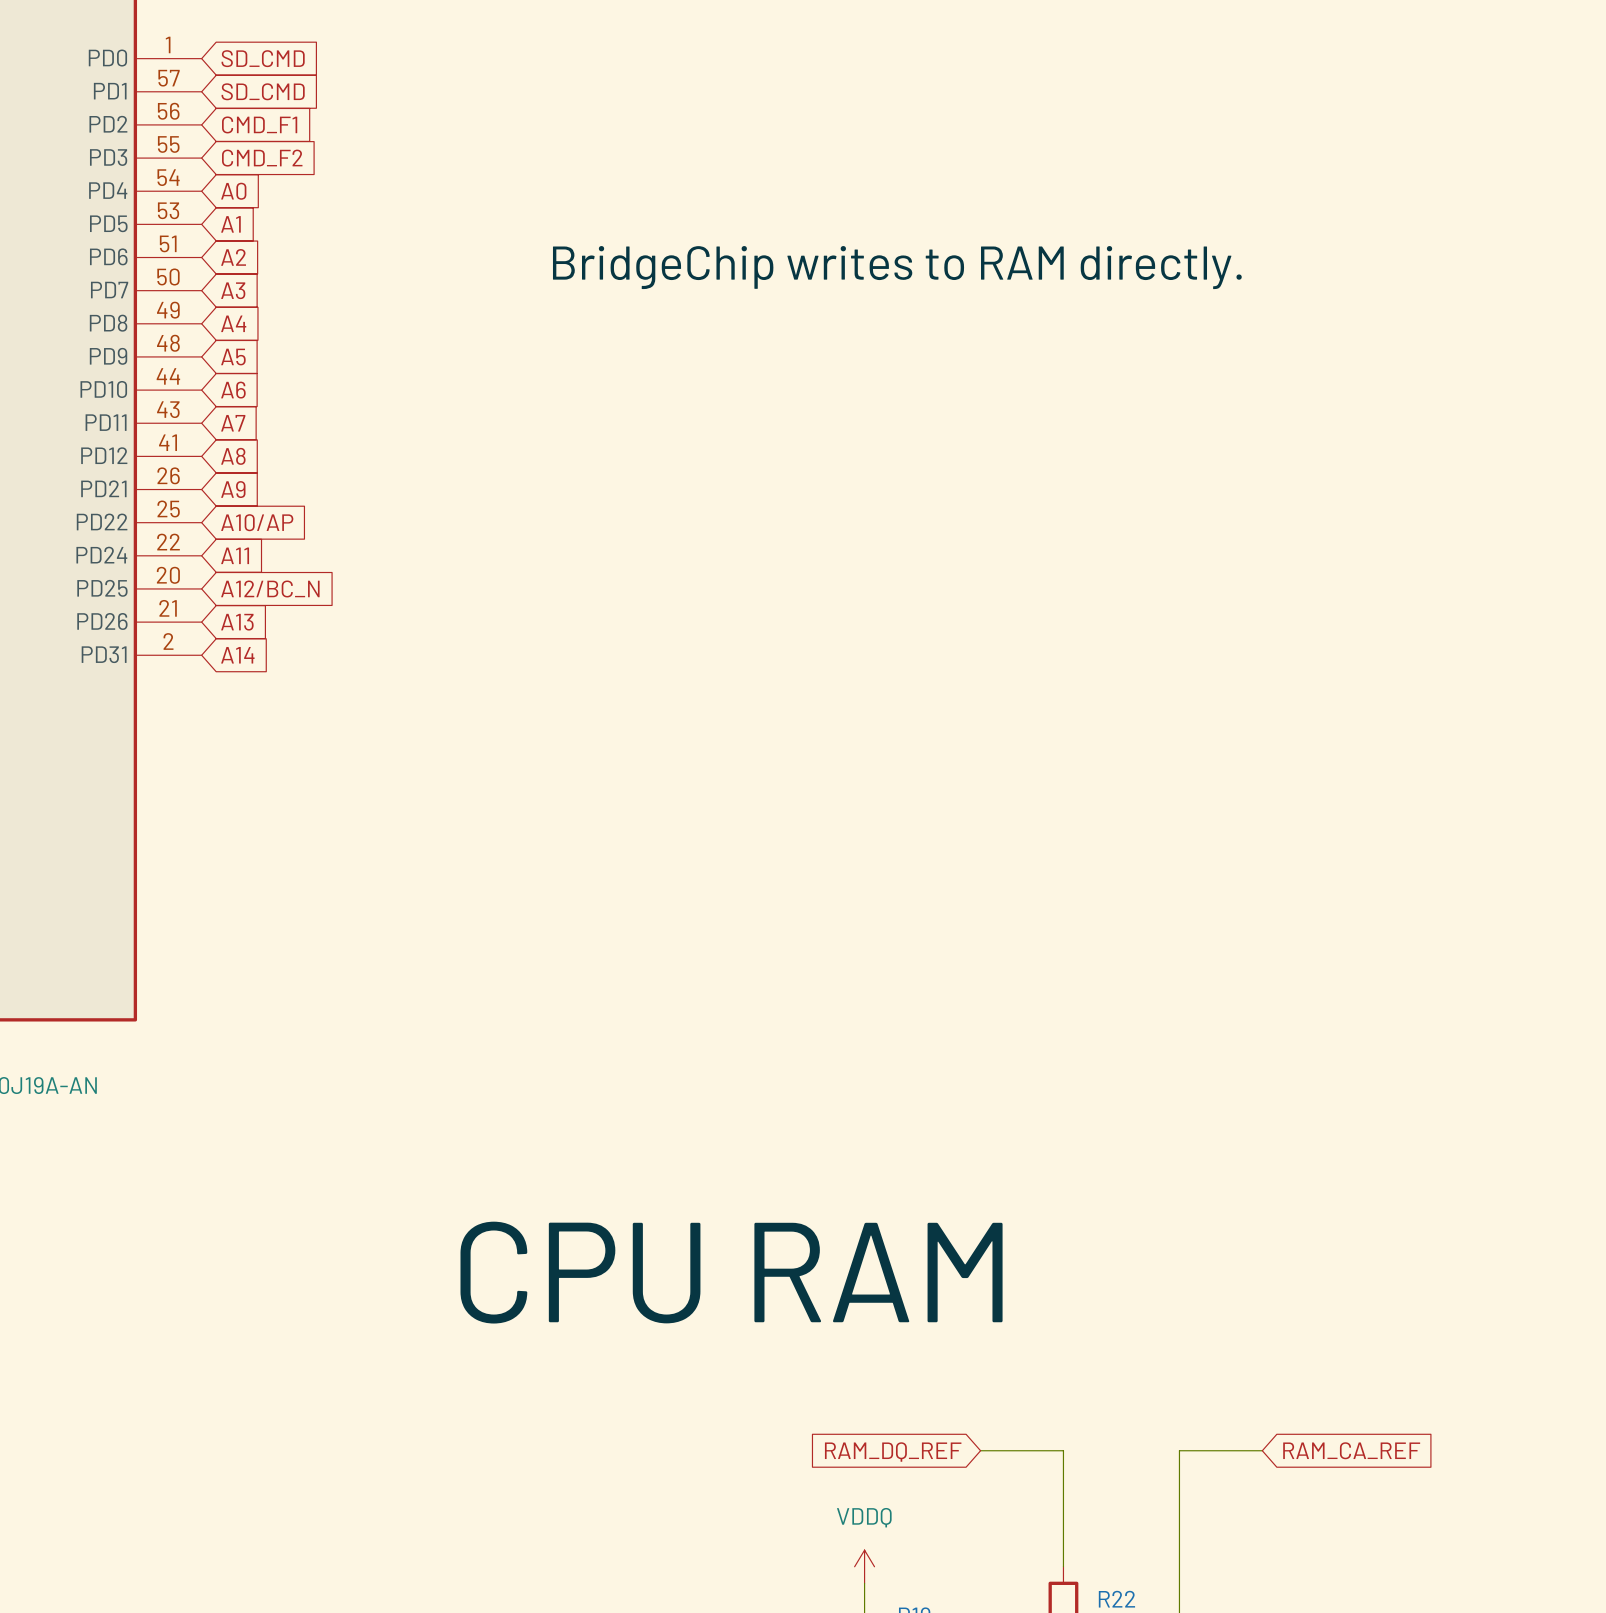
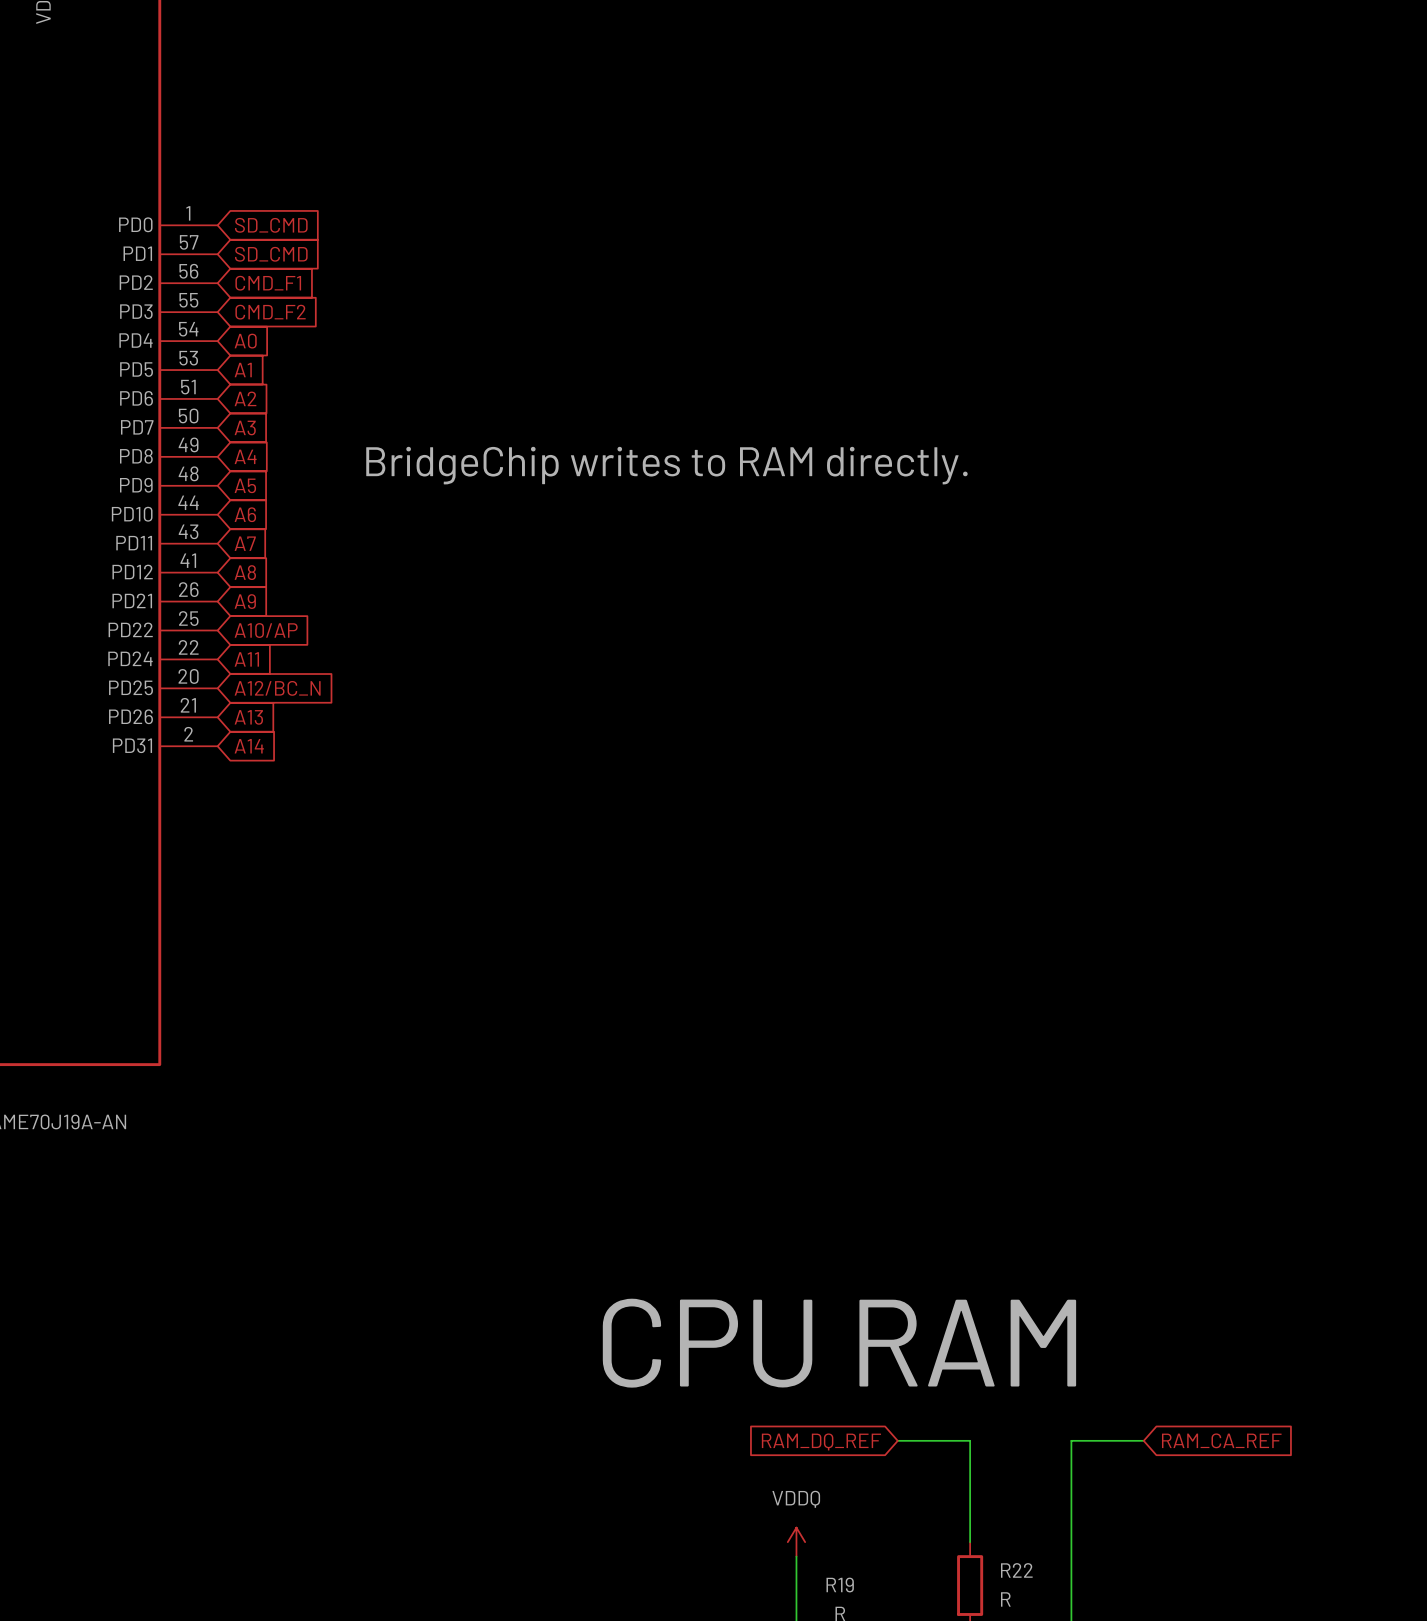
label: BridgeChip writes to RAM directly. (897, 267) -> none
label: none -> BridgeChip writes to RAM directly. (666, 465)
label position: CPU RAM (731, 1272) -> CPU RAM (839, 1343)

